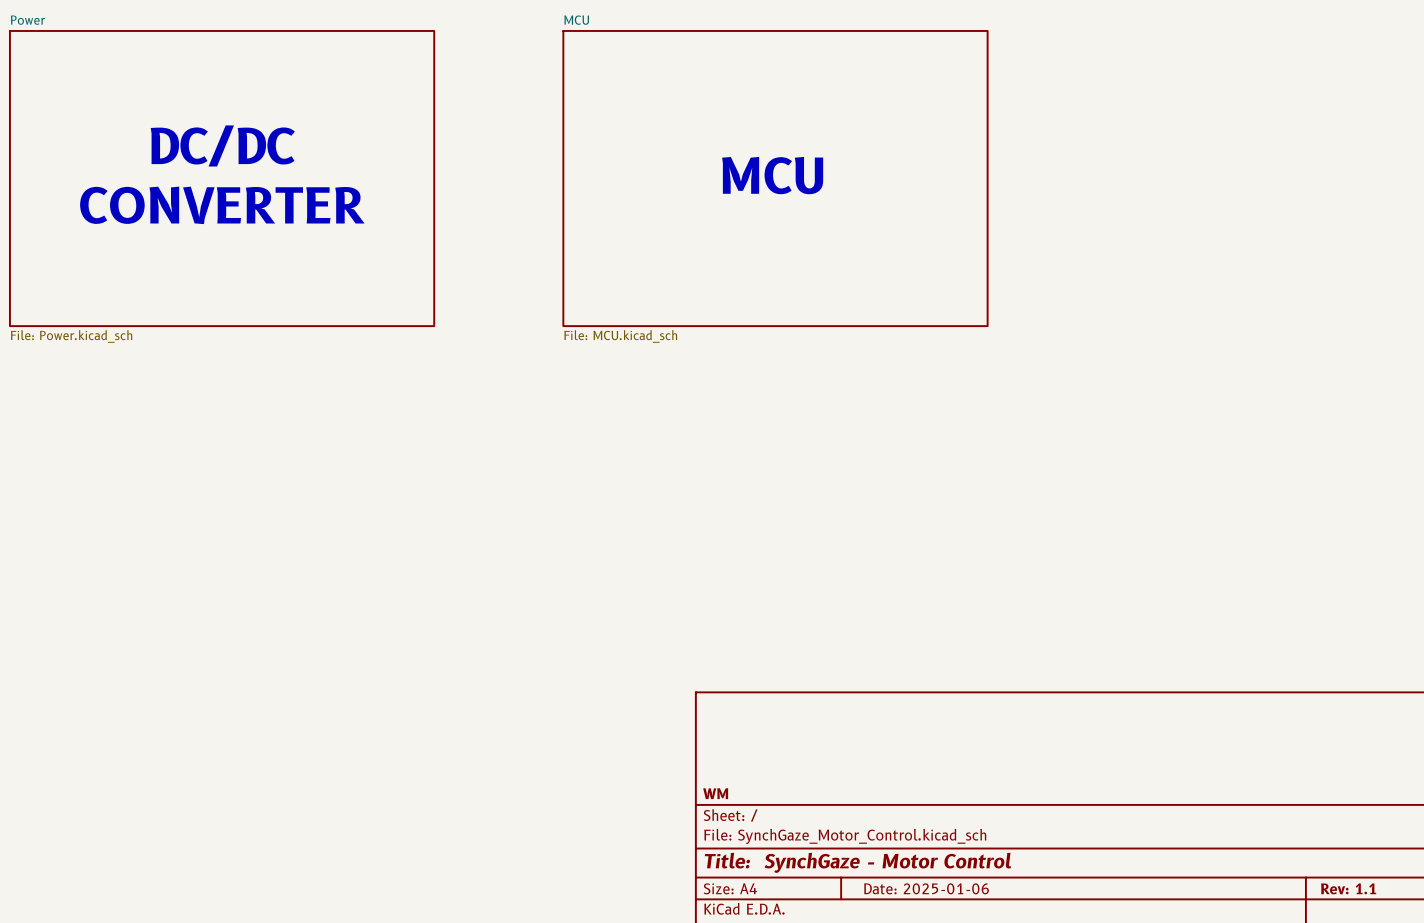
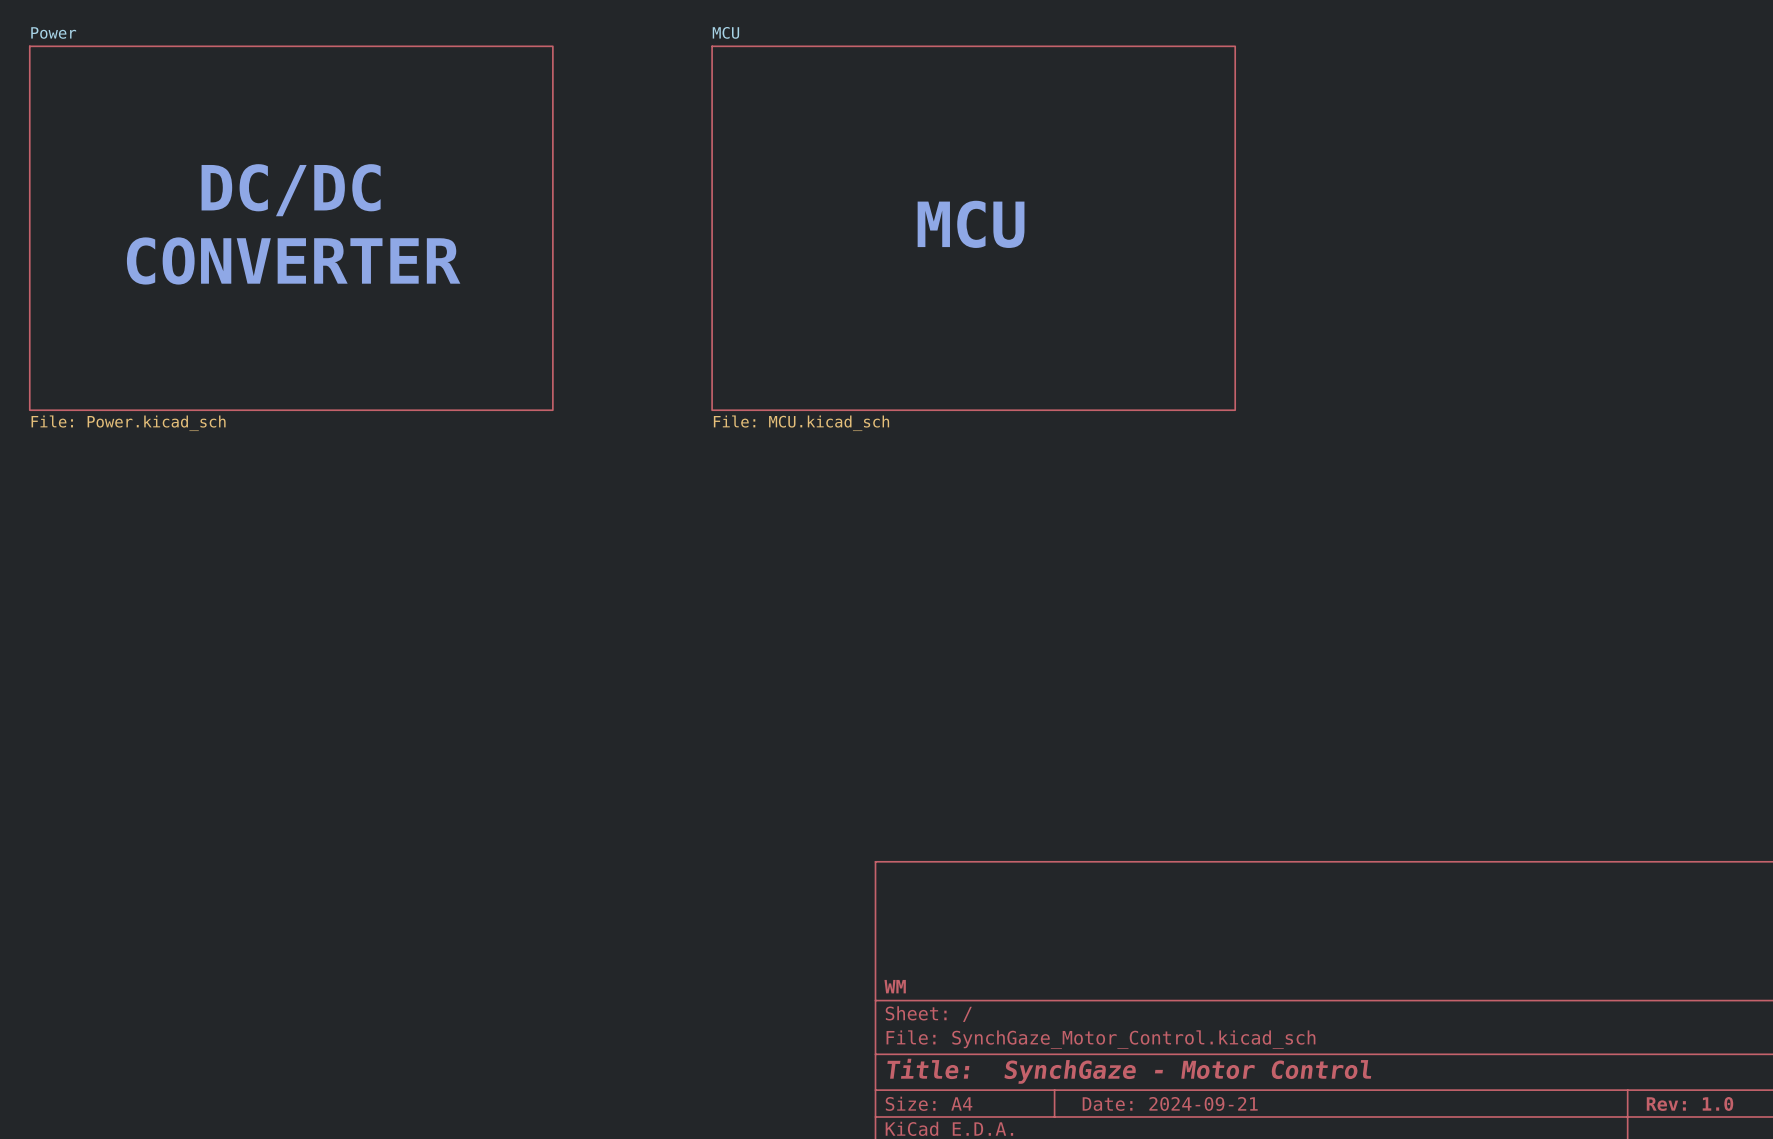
title block: Date: 2025-01-06 (926, 888) -> Date: 2024-09-21 (1170, 1103)
title block: Rev: 1.1 (1348, 888) -> Rev: 1.0 (1689, 1103)

